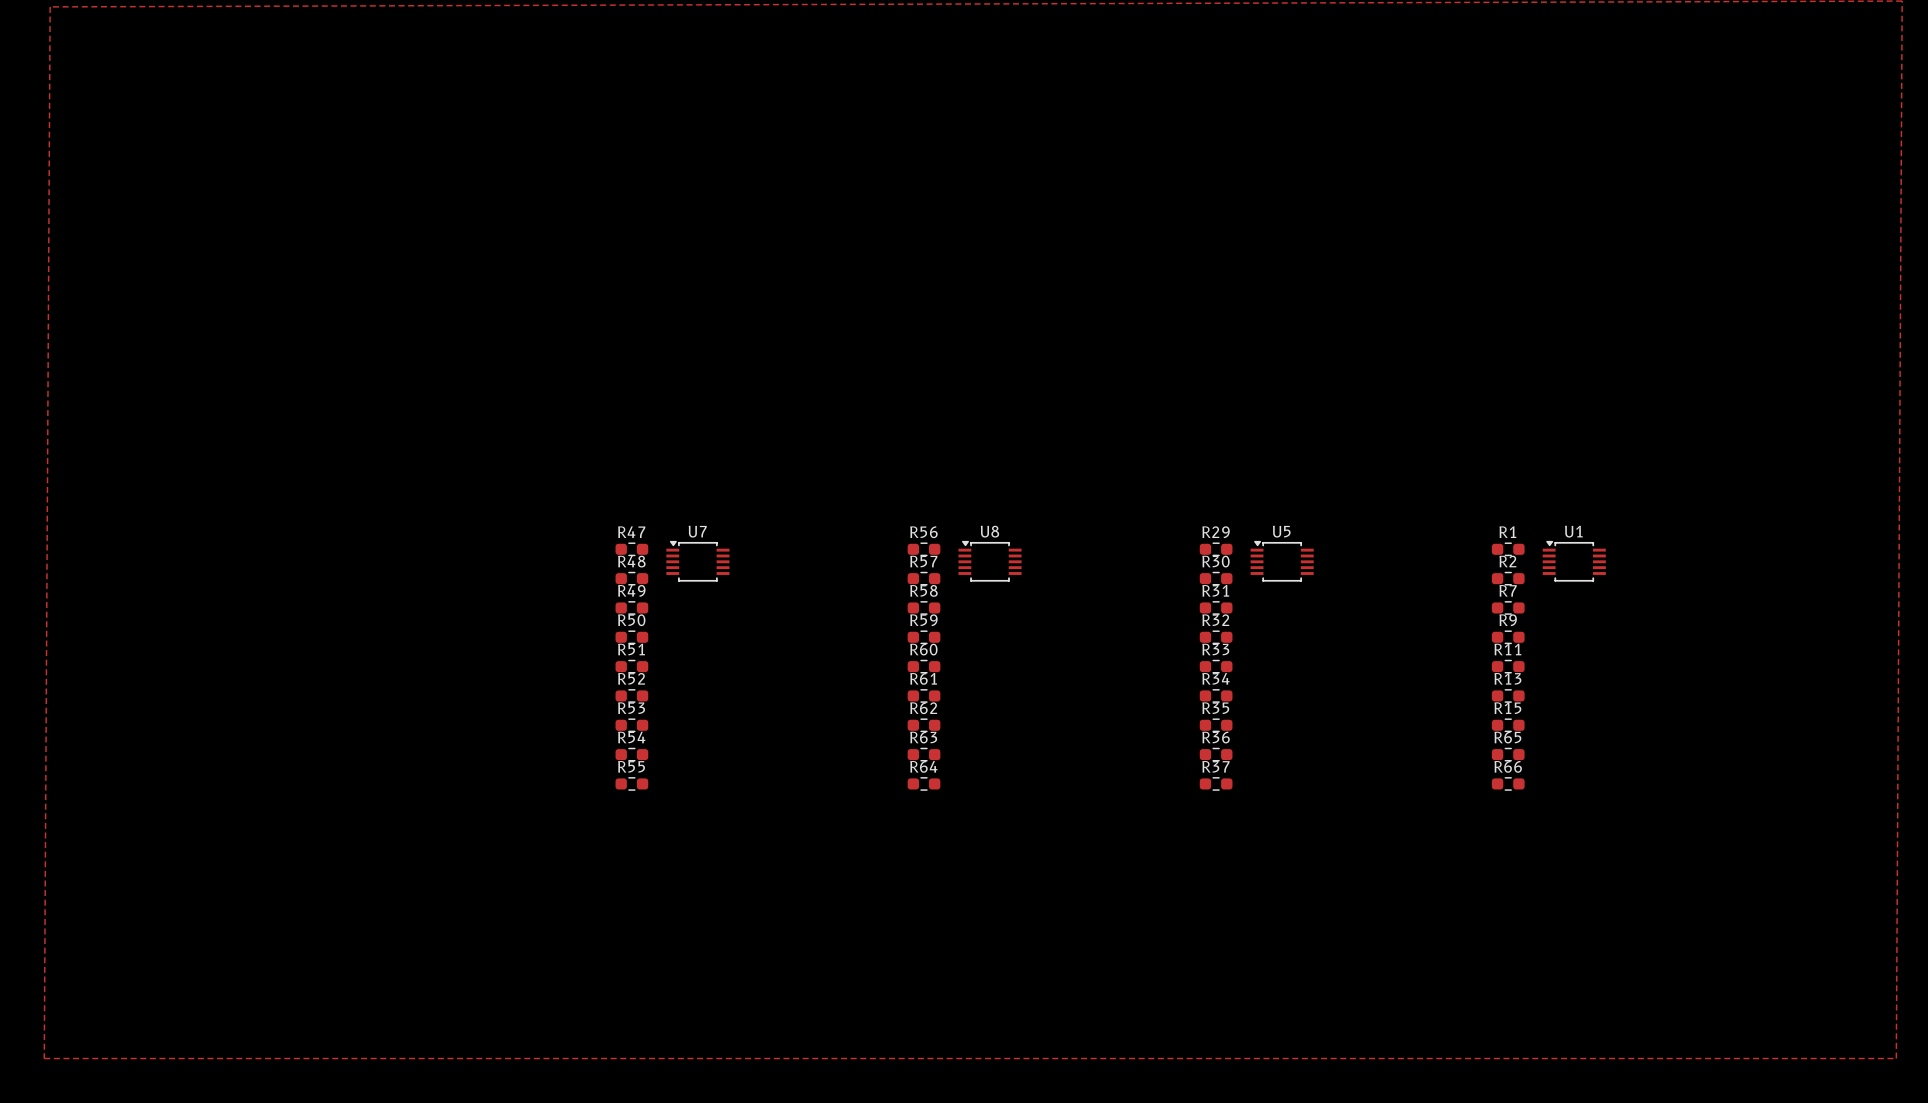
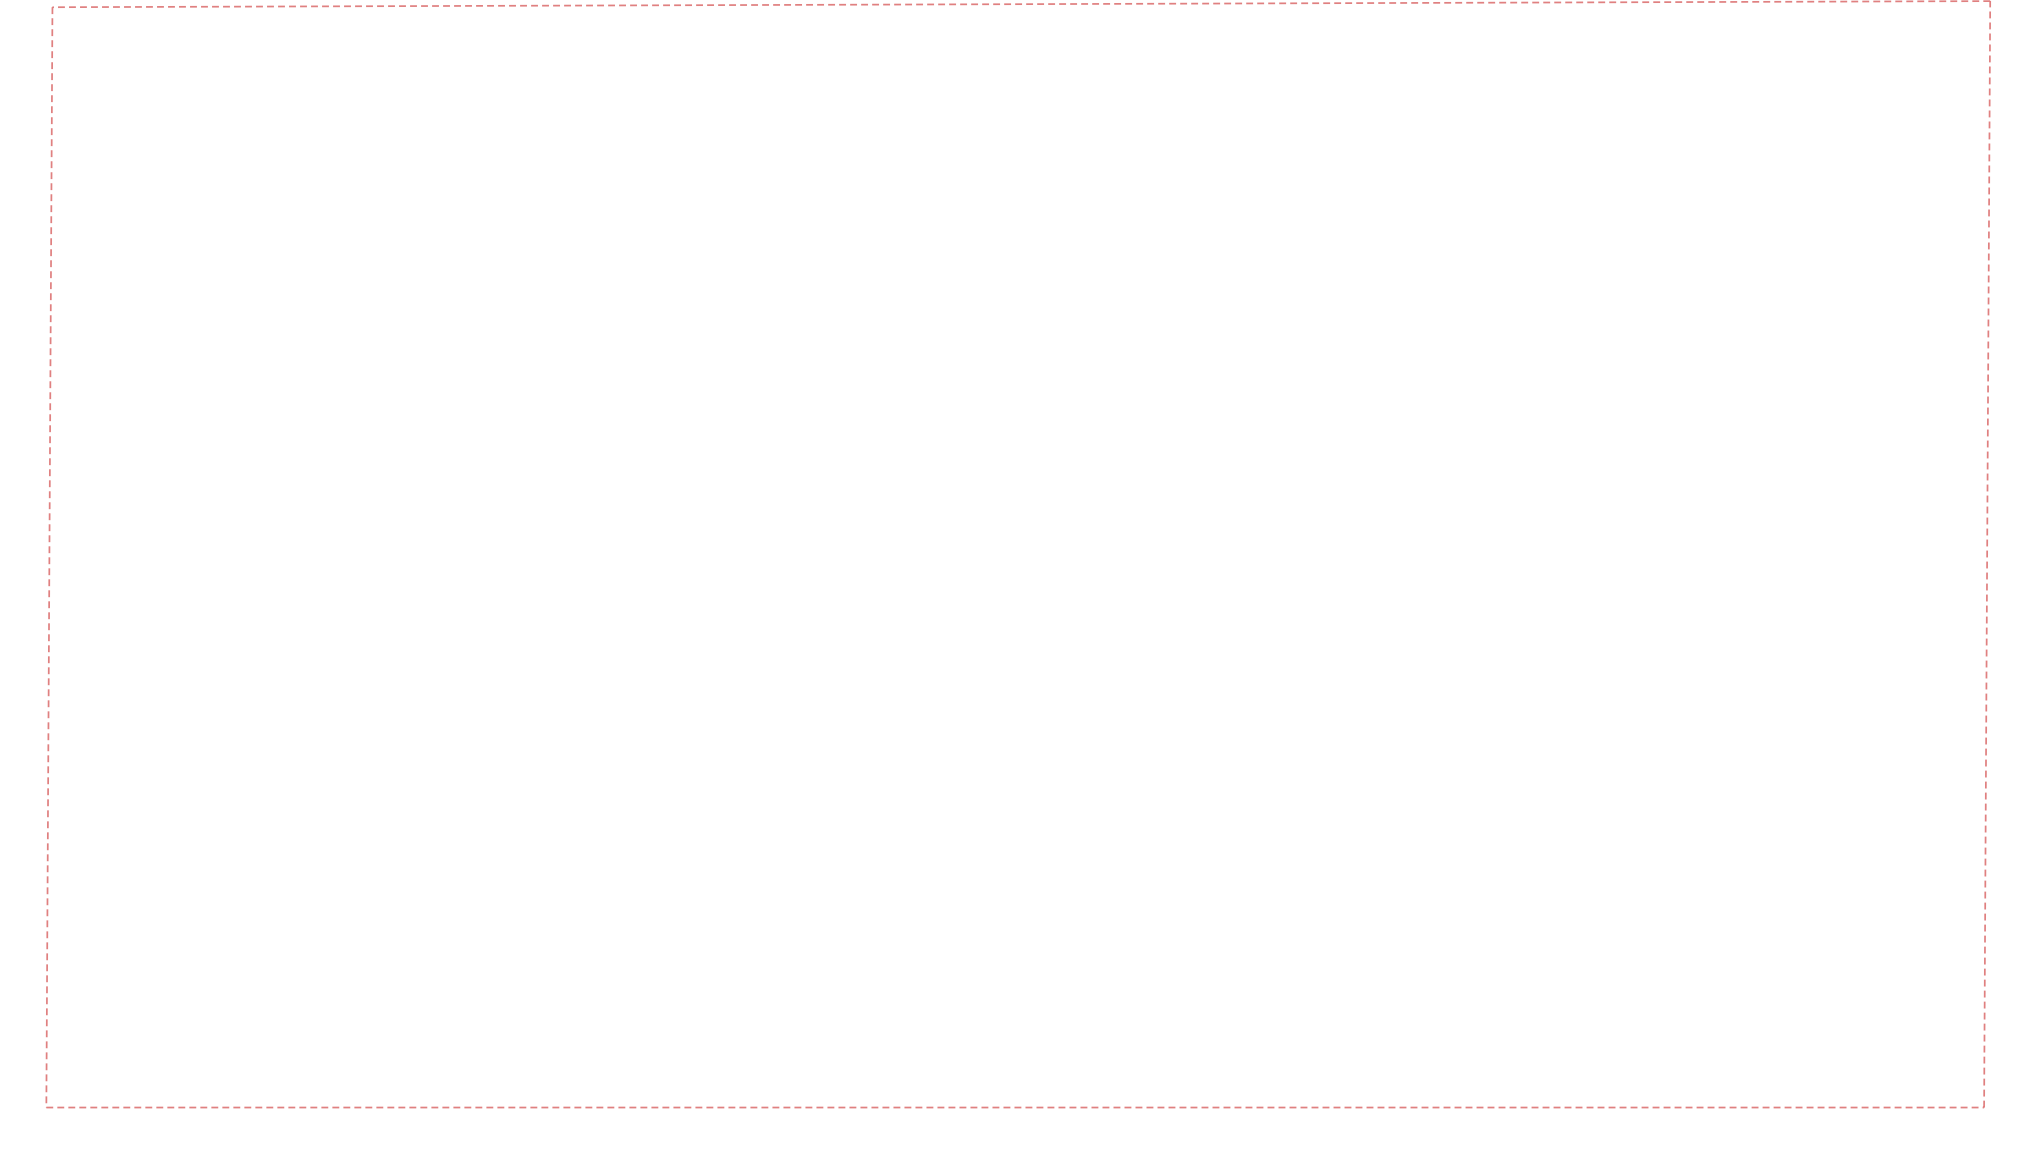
R47: (631, 549) -> none
R56: (924, 549) -> none
R29: (1216, 549) -> none
R1: (1508, 549) -> none
U7: (697, 561) -> none
U8: (990, 561) -> none
U5: (1282, 561) -> none
U1: (1574, 561) -> none
R48: (631, 578) -> none
R57: (924, 578) -> none
R30: (1216, 578) -> none
R2: (1508, 578) -> none
R49: (631, 607) -> none
R58: (924, 607) -> none
R31: (1216, 607) -> none
R7: (1508, 607) -> none
R50: (631, 637) -> none
R59: (924, 637) -> none
R32: (1216, 637) -> none
R9: (1508, 637) -> none
R51: (631, 666) -> none
R60: (924, 666) -> none
R33: (1216, 666) -> none
R11: (1508, 666) -> none
R52: (631, 695) -> none
R61: (924, 695) -> none
R34: (1216, 695) -> none
R13: (1508, 695) -> none
R53: (631, 725) -> none
R62: (924, 725) -> none
R35: (1216, 725) -> none
R15: (1508, 725) -> none
R54: (631, 754) -> none
R63: (924, 754) -> none
R36: (1216, 754) -> none
R65: (1508, 754) -> none
R55: (631, 783) -> none
R64: (924, 783) -> none
R37: (1216, 783) -> none
R66: (1508, 783) -> none

